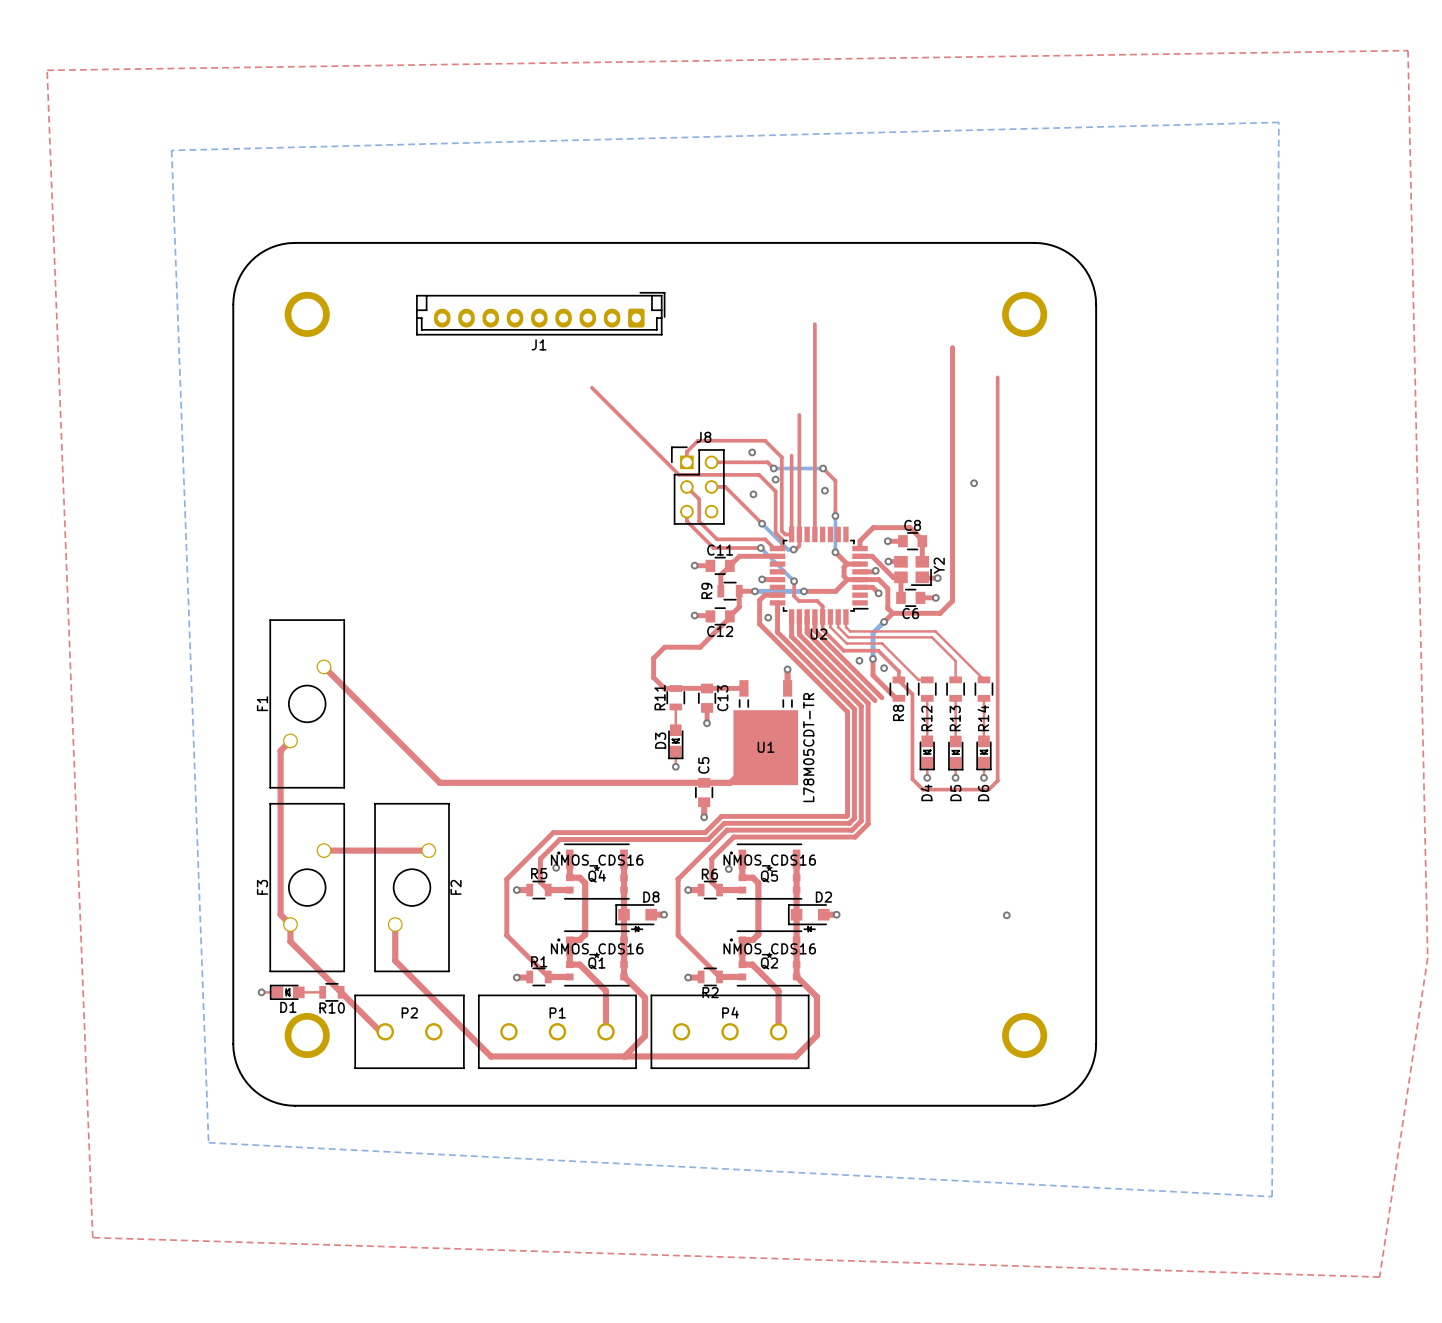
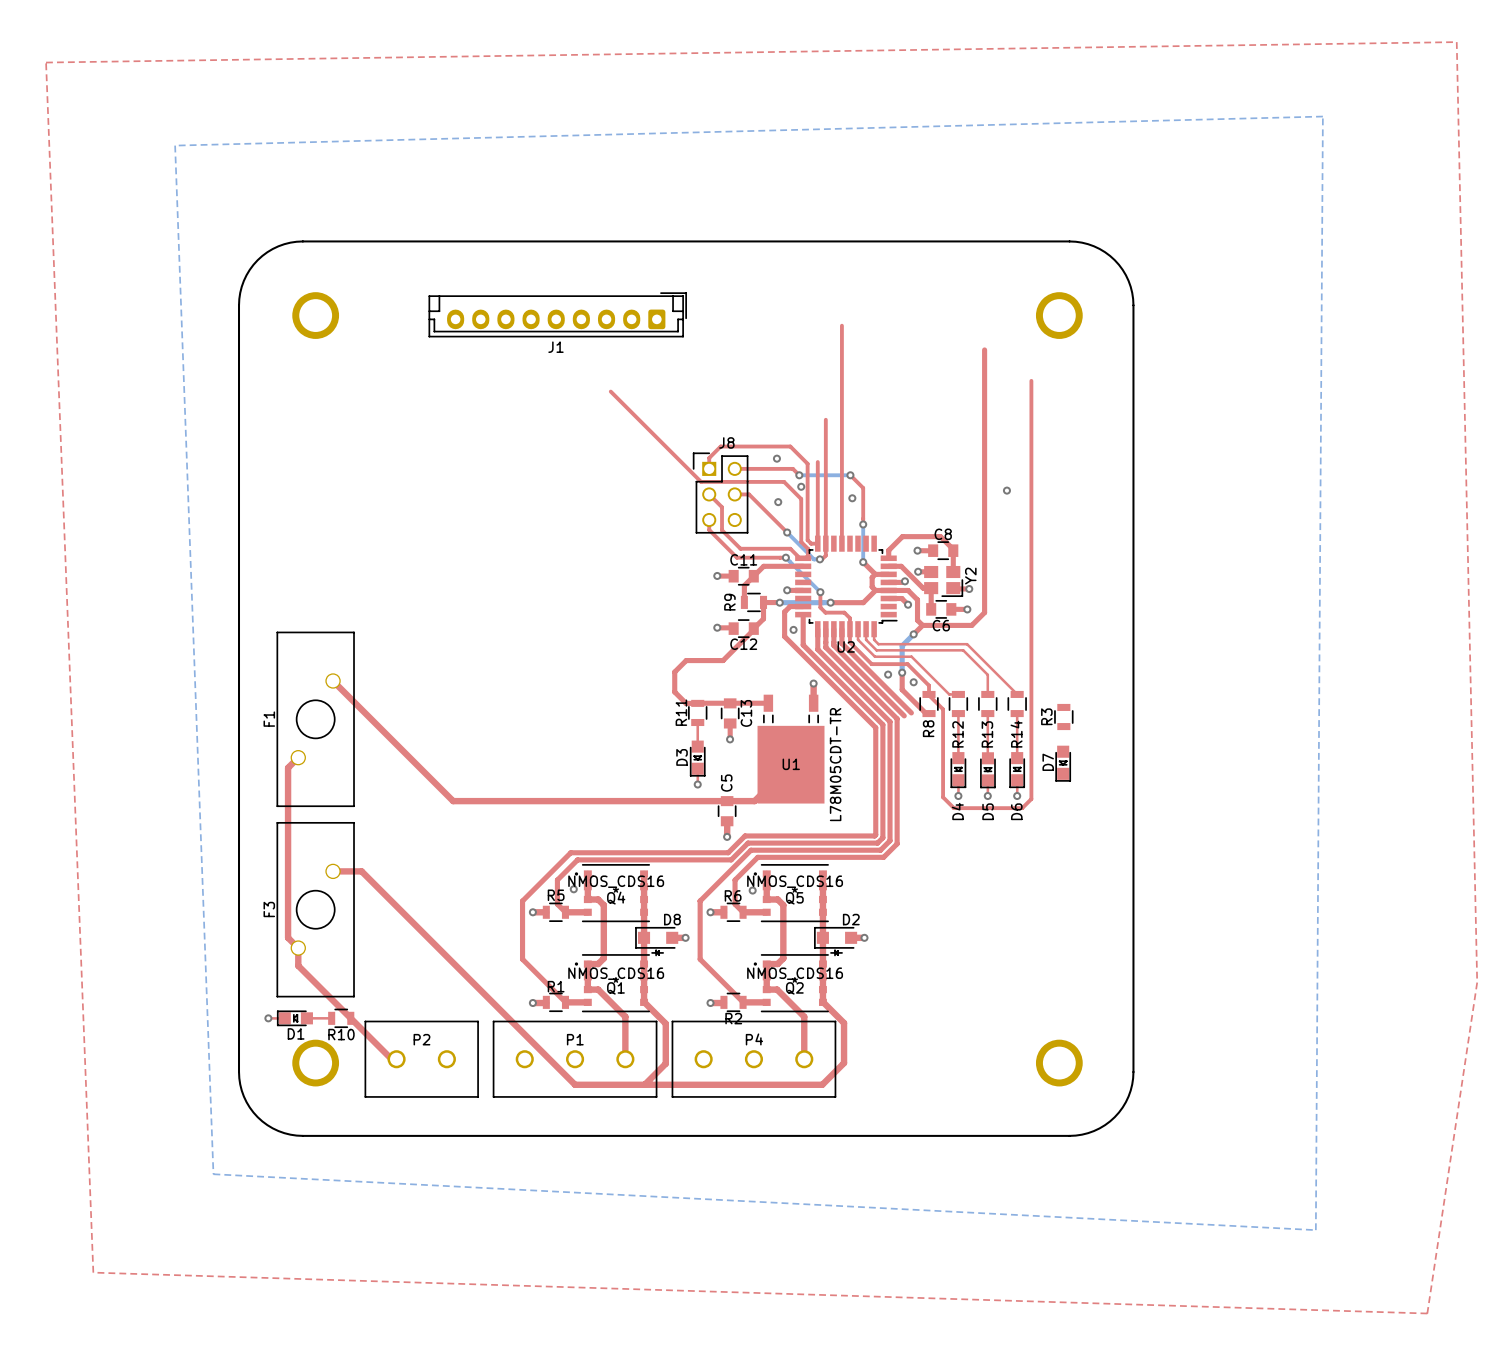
R3: none -> (1063, 717)
D7: none -> (1063, 763)
top track: (351, 850) (428, 850) -> none
F2: (412, 887) -> none
via: (1006, 915) -> none
top track: (395, 924) (395, 960) (490, 1056) (557, 1056) -> (361, 871) (575, 1084)

